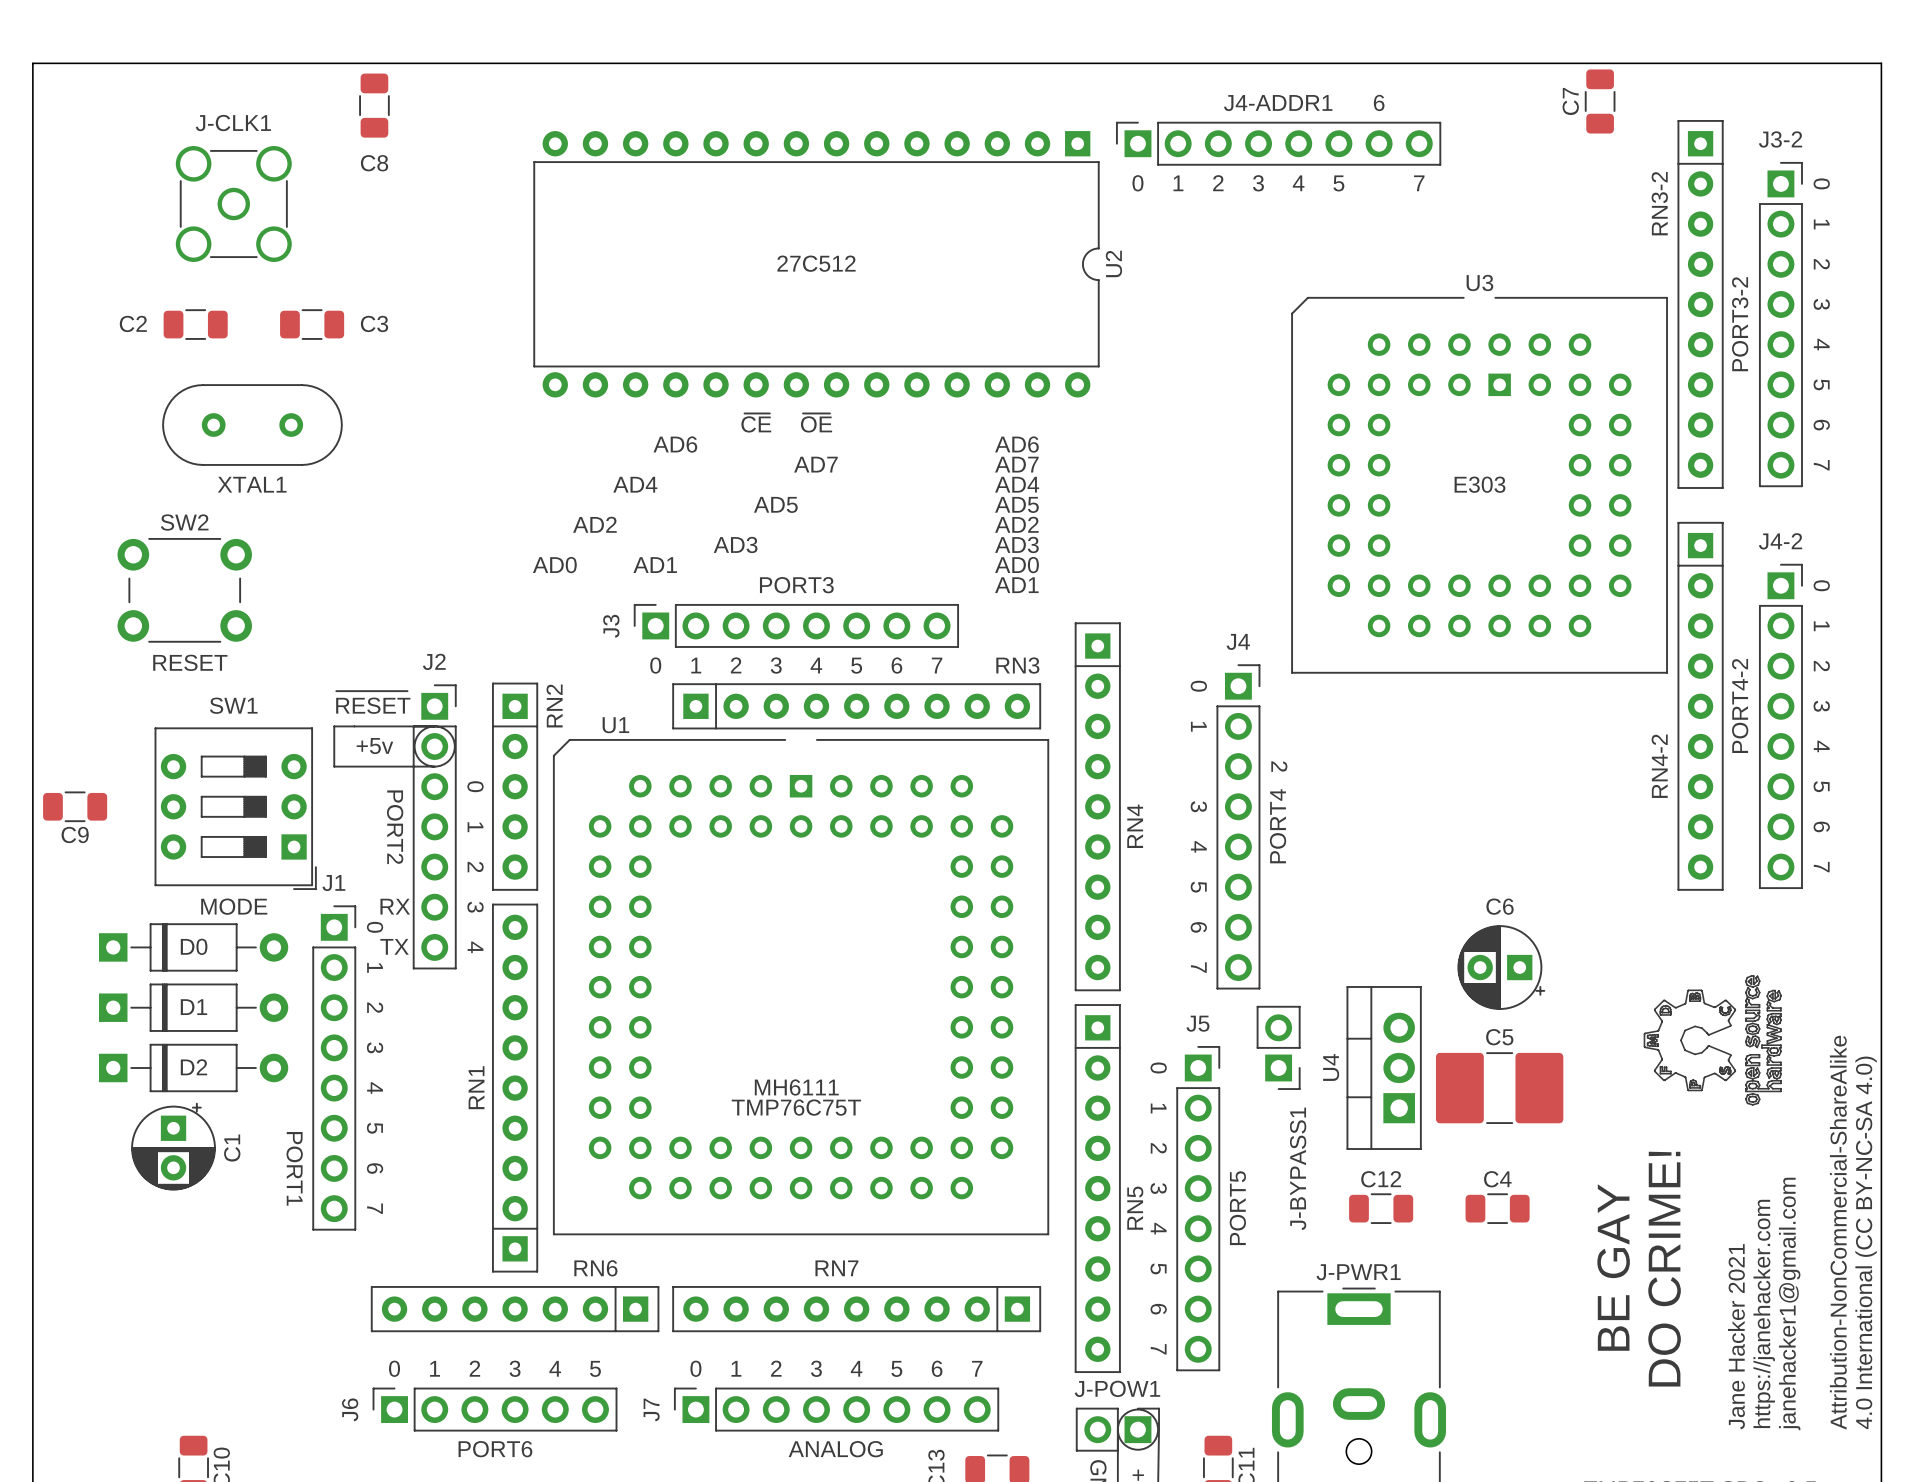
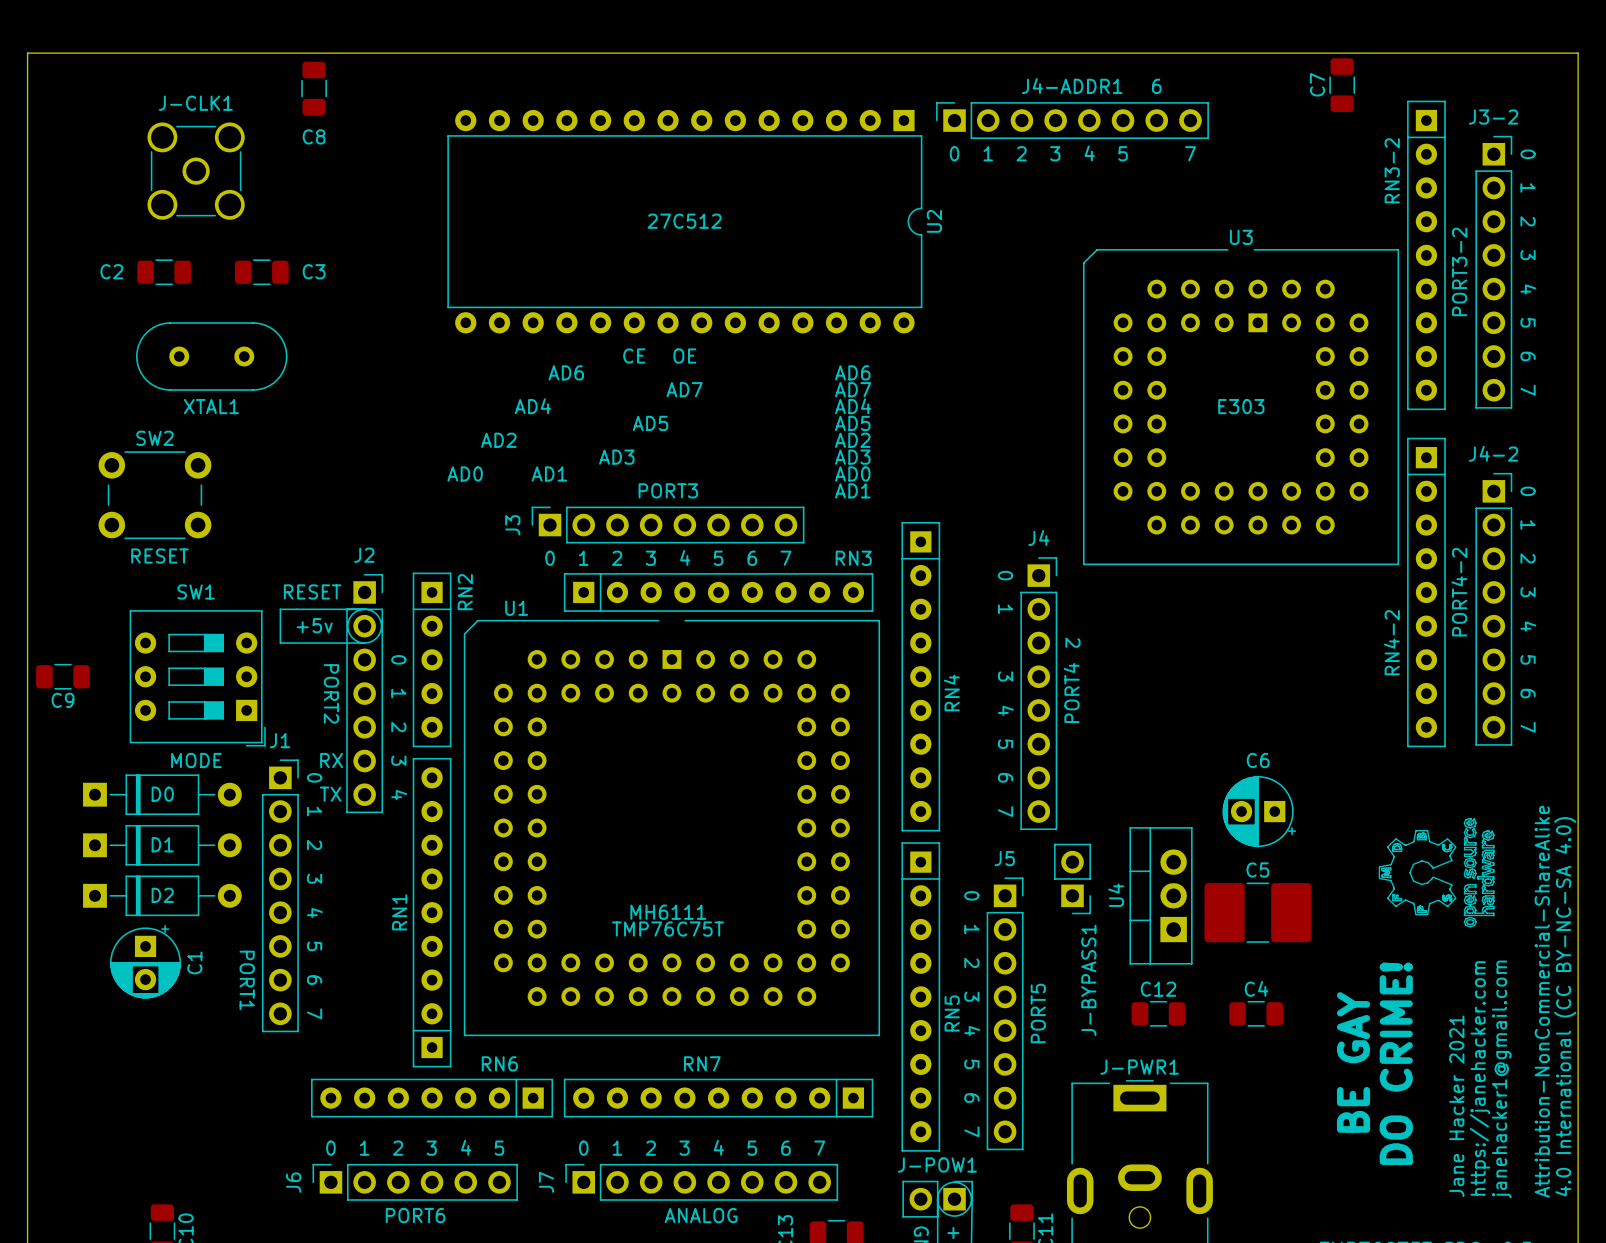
line: (744, 413) (769, 413) -> none
line: (803, 413) (829, 413) -> none
line: (336, 691) (407, 691) -> none

